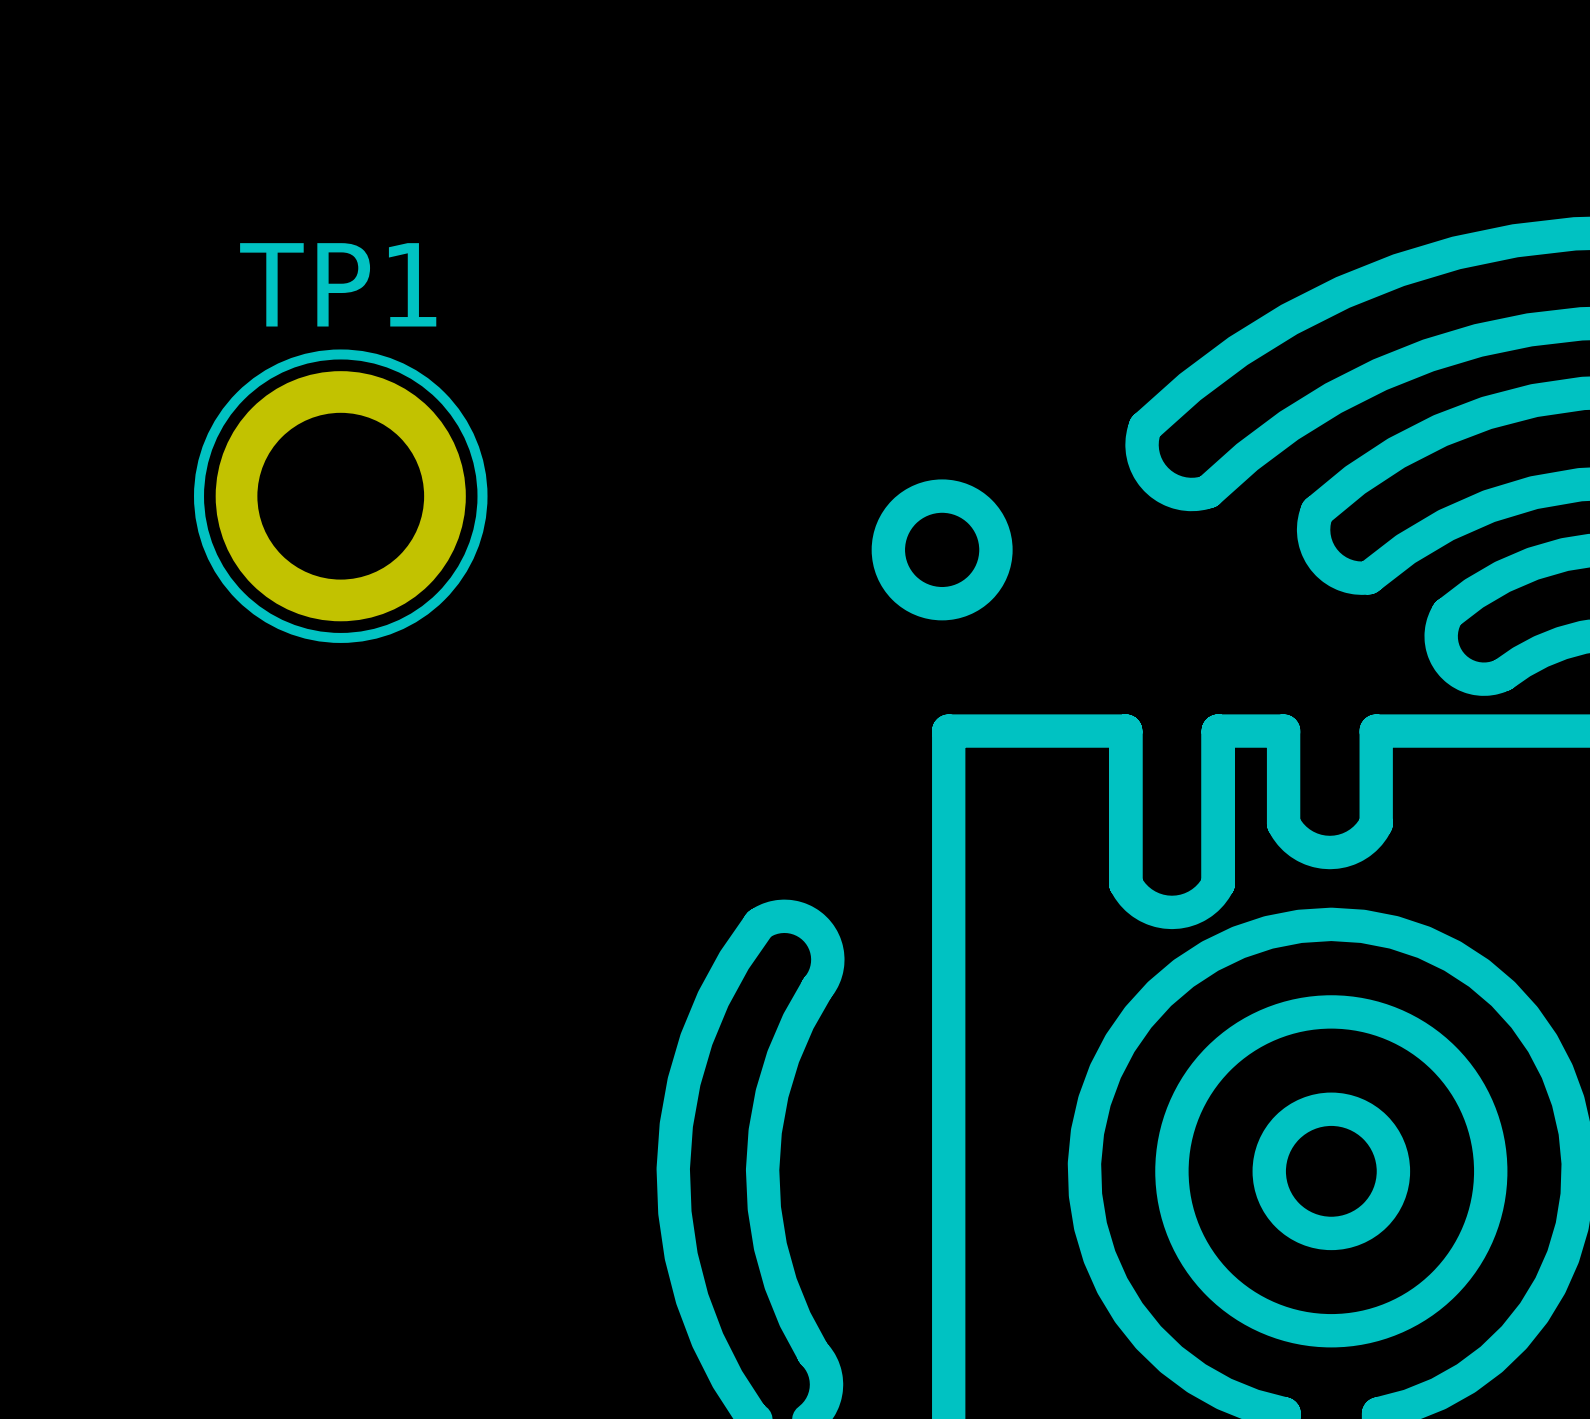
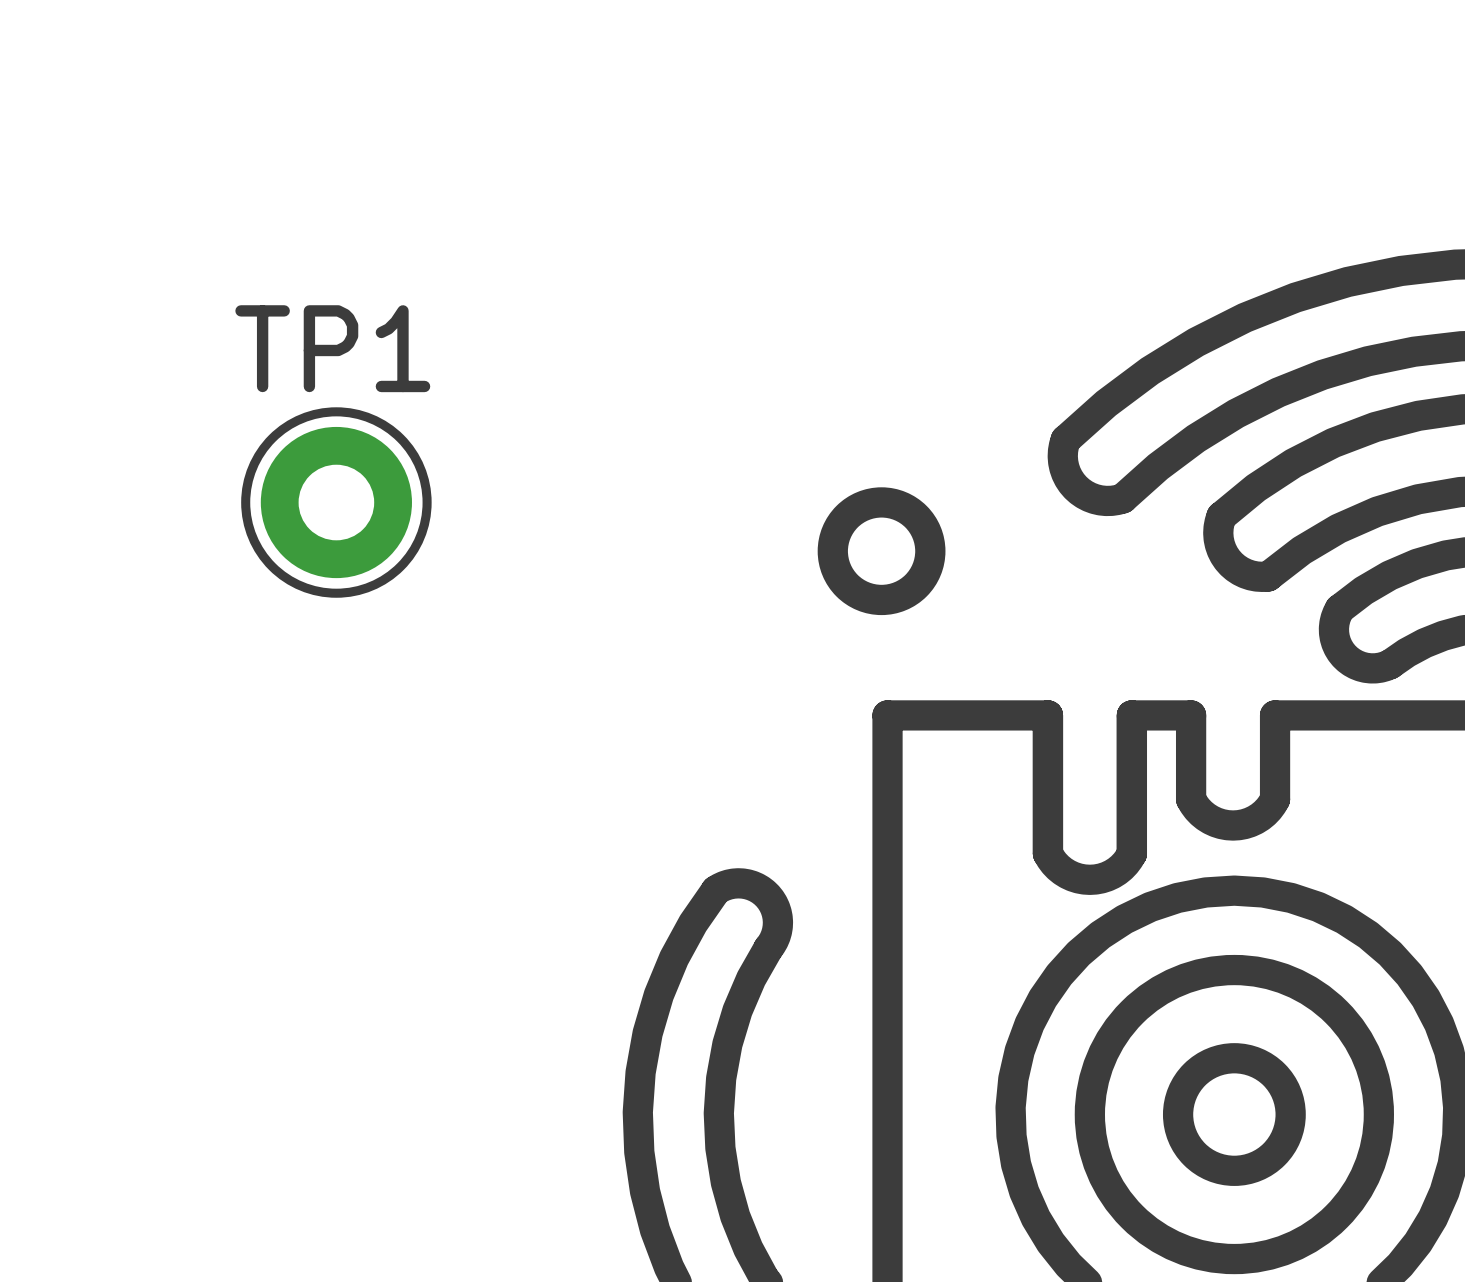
TP1 name position: TP1 (338, 284) -> TP1 (332, 348)
TP1 footprint: [194, 349, 488, 643] -> [241, 407, 432, 598]

